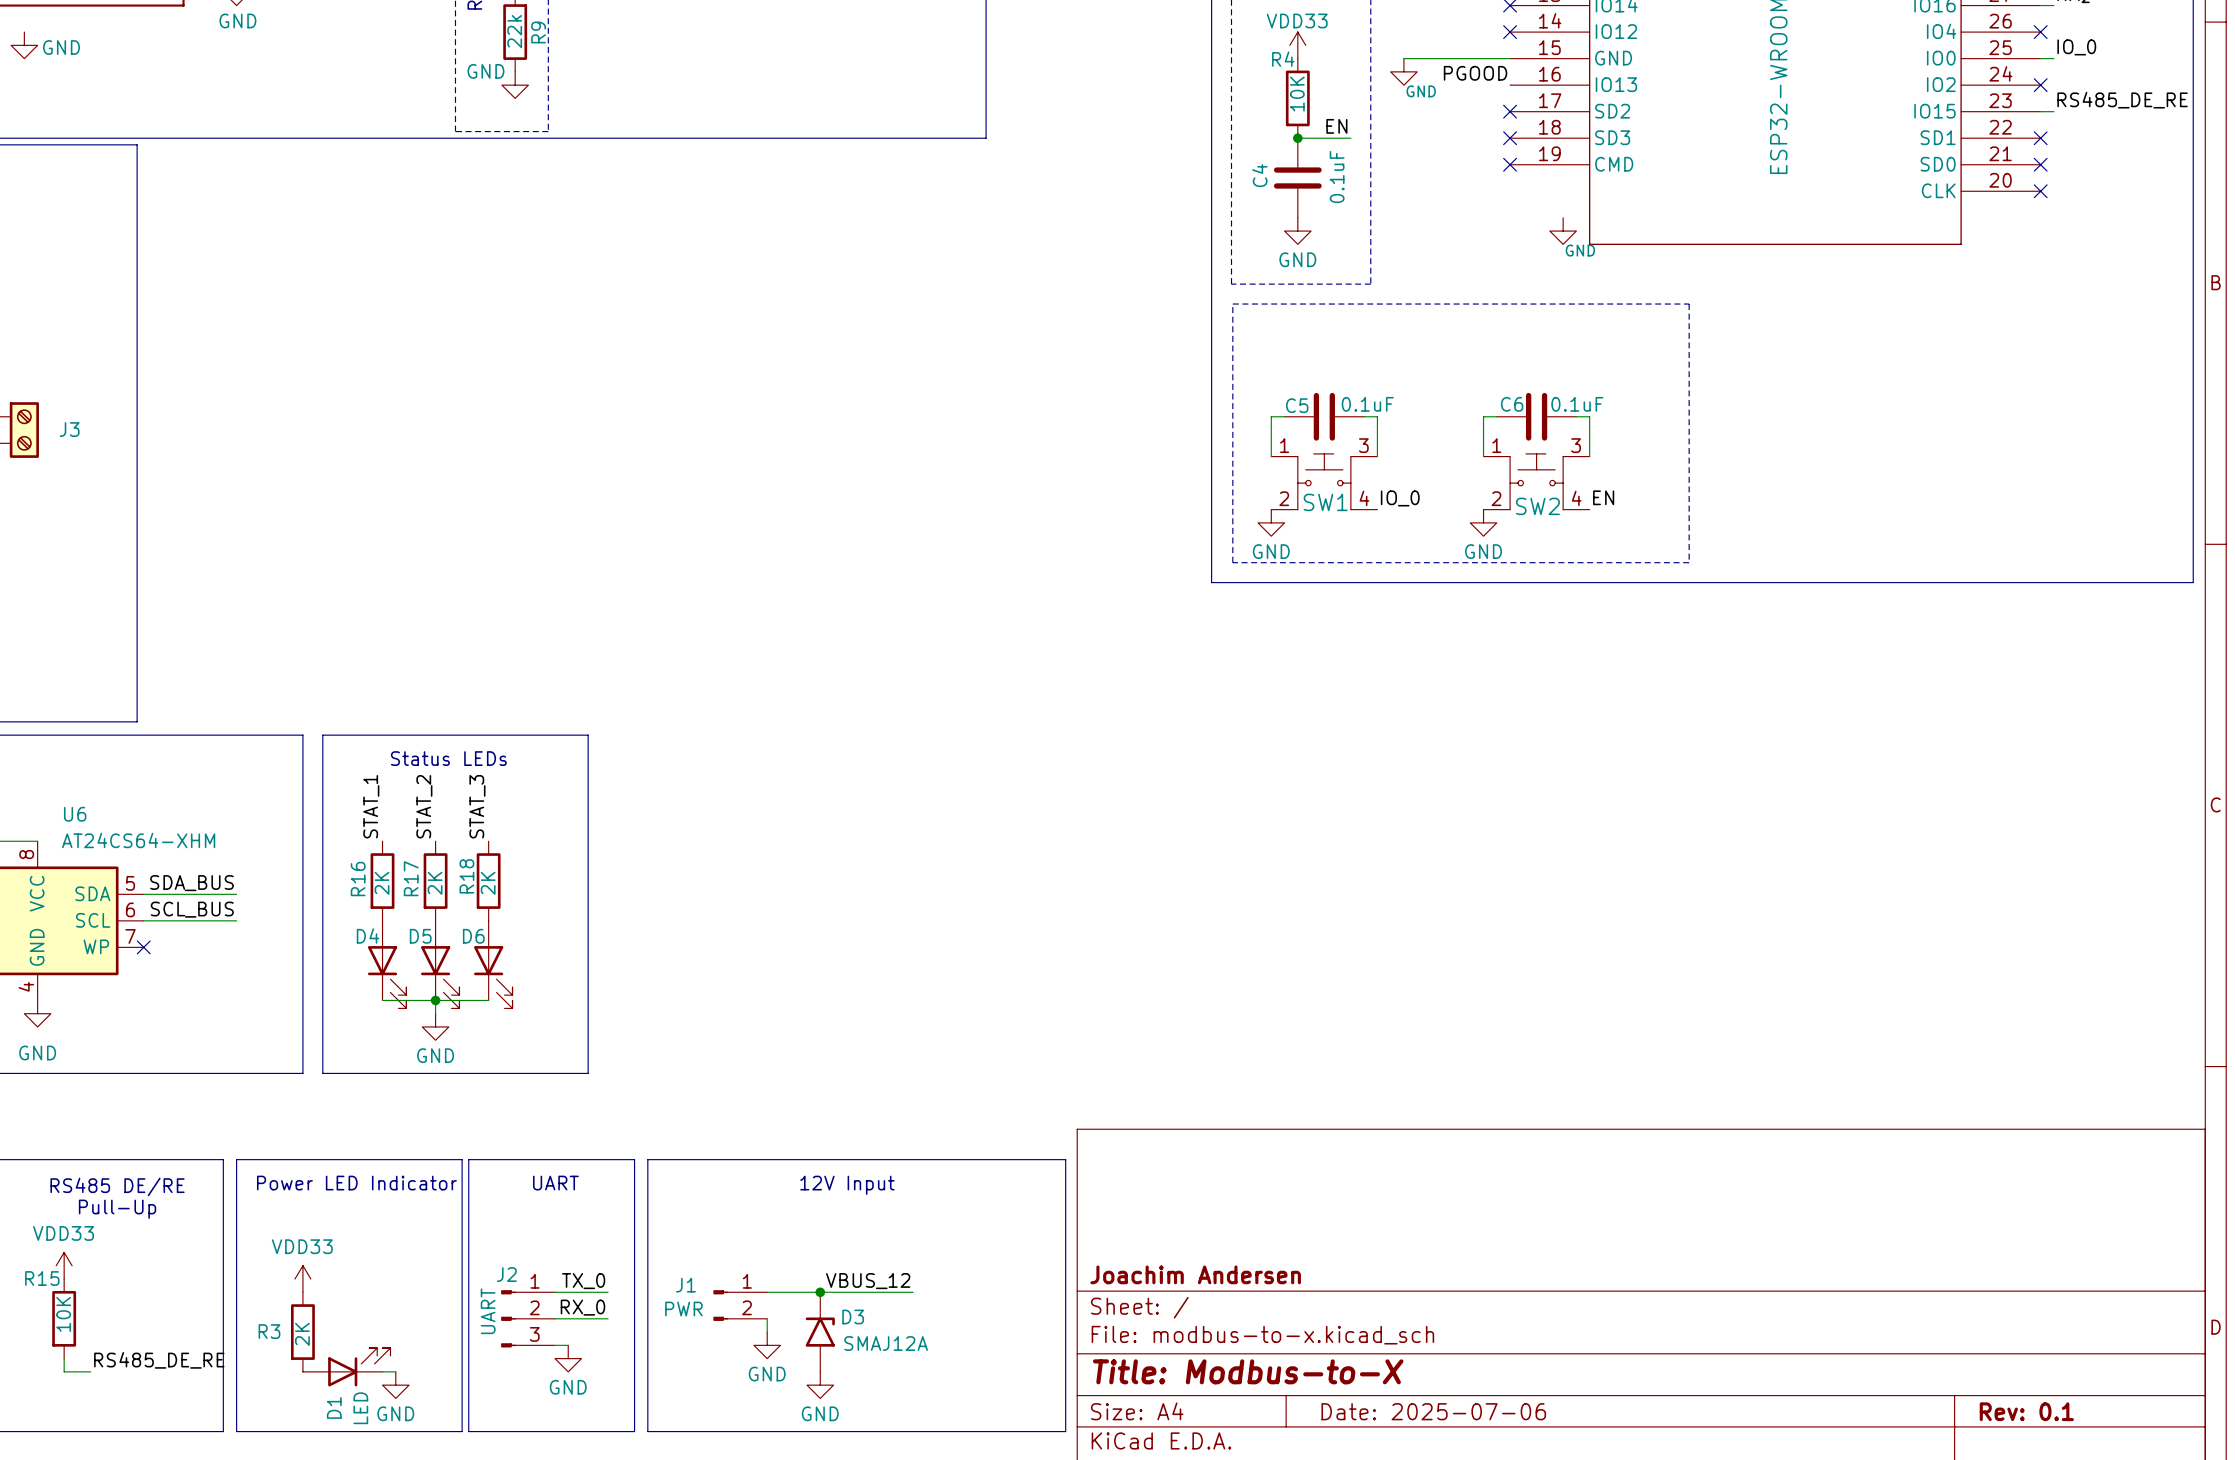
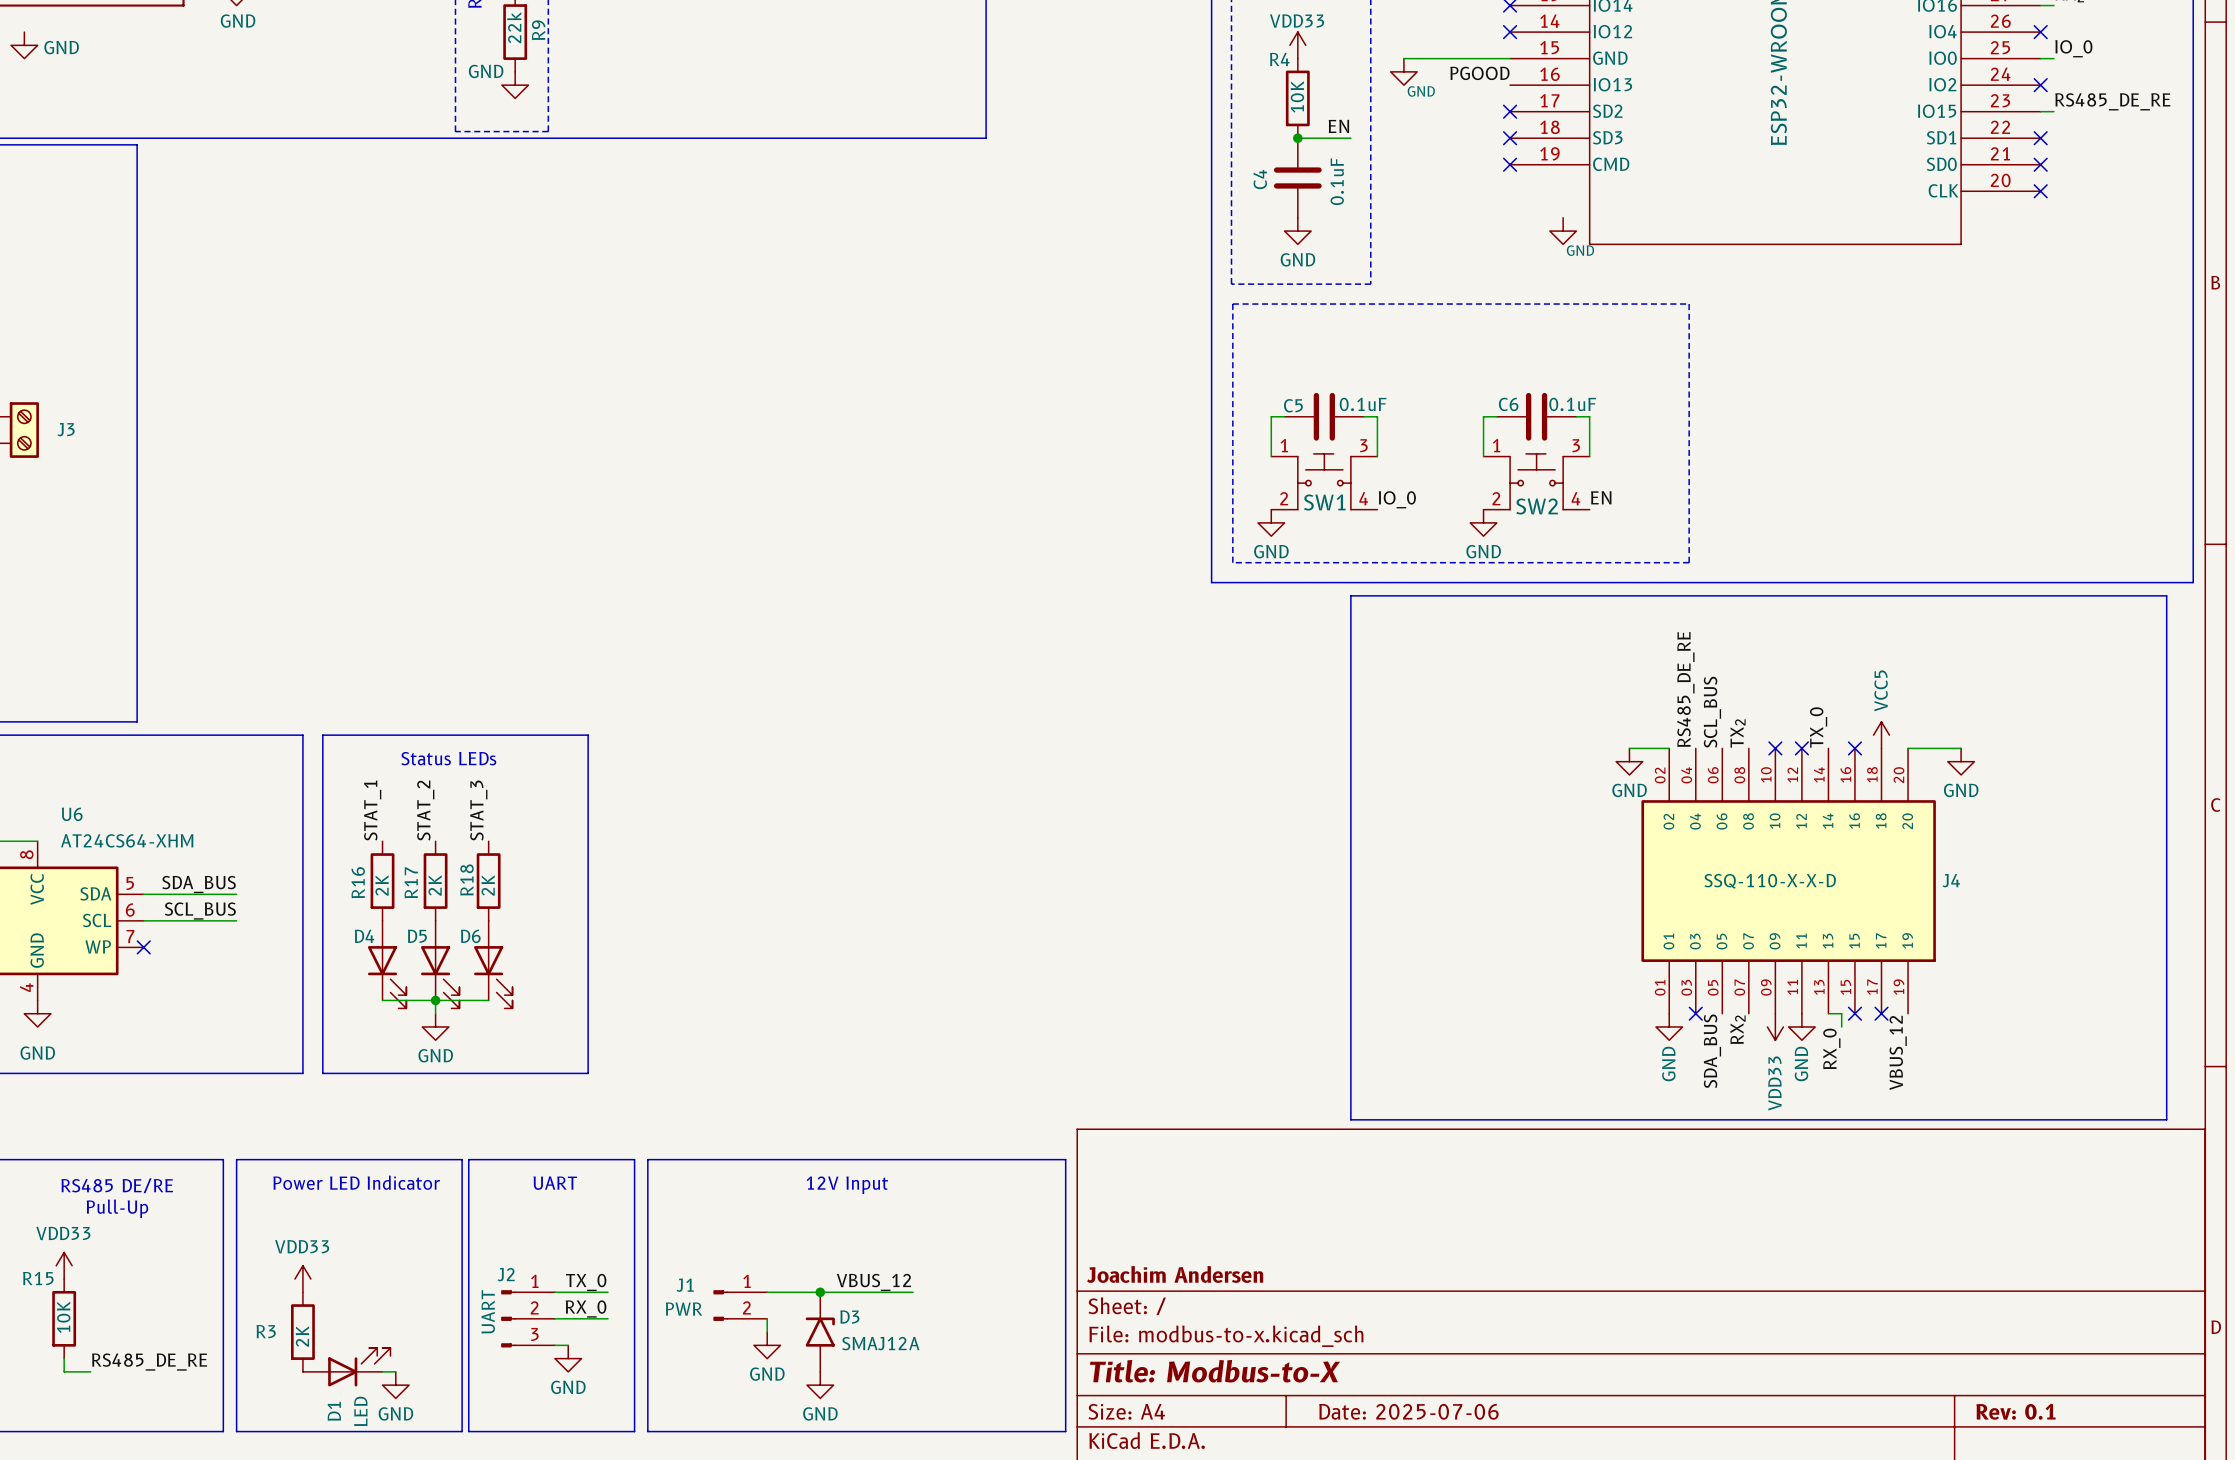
line: none -> (1350, 595) (2166, 595) (2166, 1119) (1350, 1119) (1350, 595)
label: none -> RS485_DE_RE (1685, 689)
label: none -> SCL_BUS (1712, 712)
label: none -> TX_0 (1818, 727)
label: none -> TX2 (1738, 733)
power symbol: none -> VCC5 (1881, 735)
wire: none -> (1629, 748) (1669, 748)
no-connect mark: none -> (1775, 748)
no-connect mark: none -> (1801, 748)
no-connect mark: none -> (1854, 748)
wire: none -> (1908, 748) (1961, 748)
power symbol: none -> GND (1629, 761)
power symbol: none -> GND (1961, 761)
J4: none -> SSQ-110-X-X-D (1788, 881)
no-connect mark: none -> (1695, 1013)
wire: none -> (1828, 1013) (1841, 1013) (1841, 1026)
no-connect mark: none -> (1854, 1013)
no-connect mark: none -> (1881, 1013)
power symbol: none -> GND (1669, 1026)
power symbol: none -> VDD33 (1775, 1026)
power symbol: none -> GND (1801, 1026)
label: none -> RX2 (1738, 1029)
label: none -> RX_0 (1831, 1048)
label: none -> SDA_BUS (1712, 1051)
label: none -> VBUS_12 (1898, 1052)

